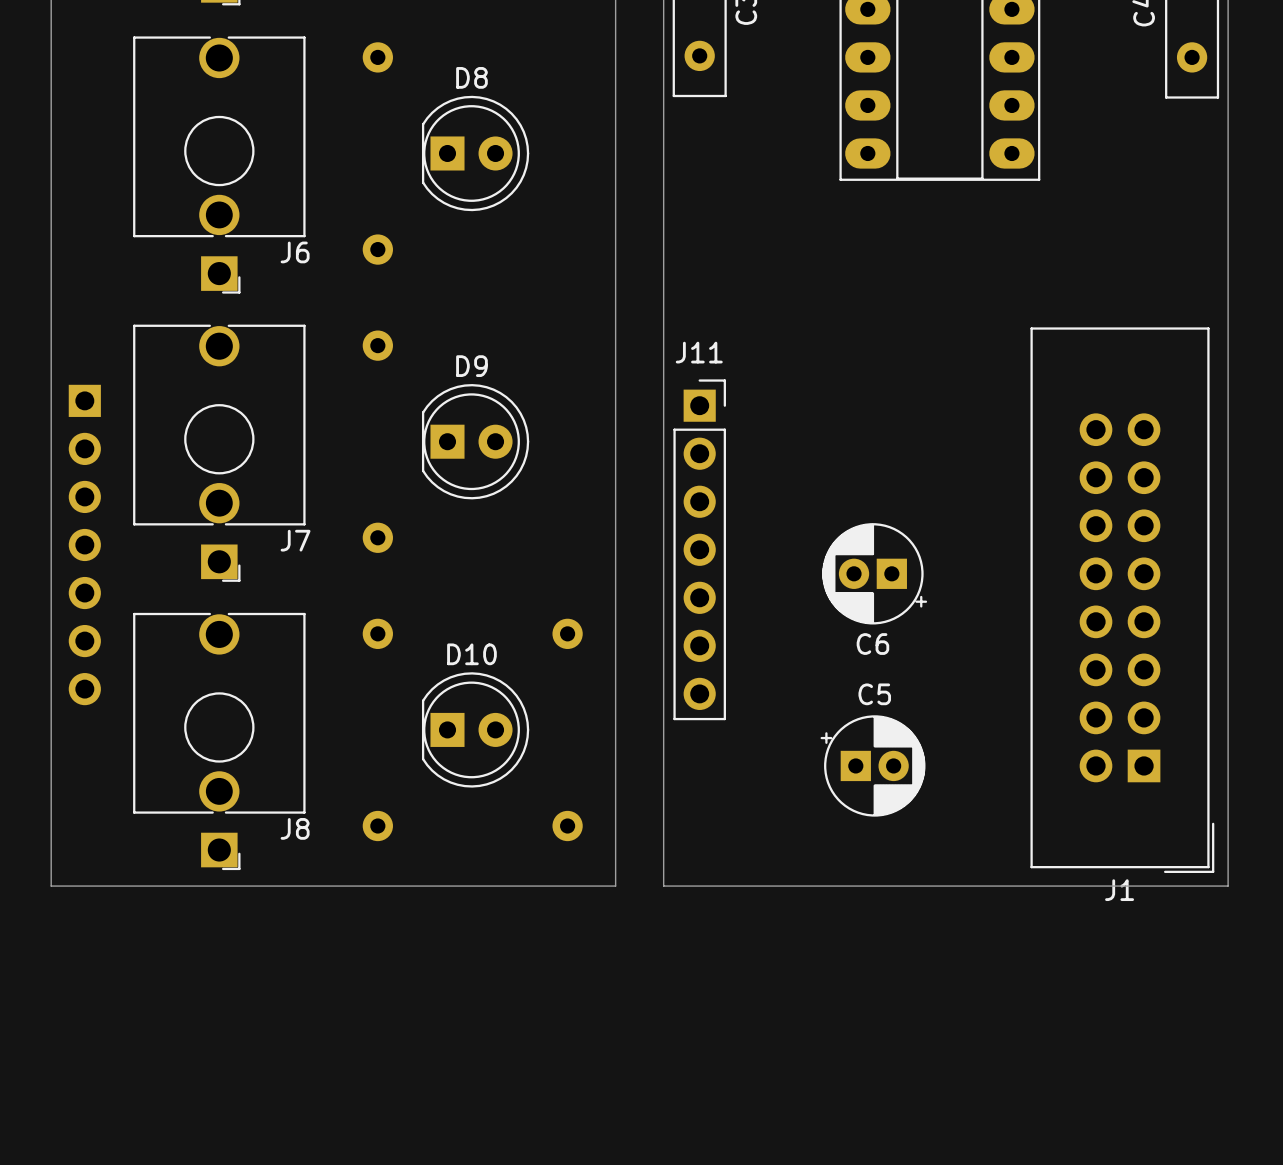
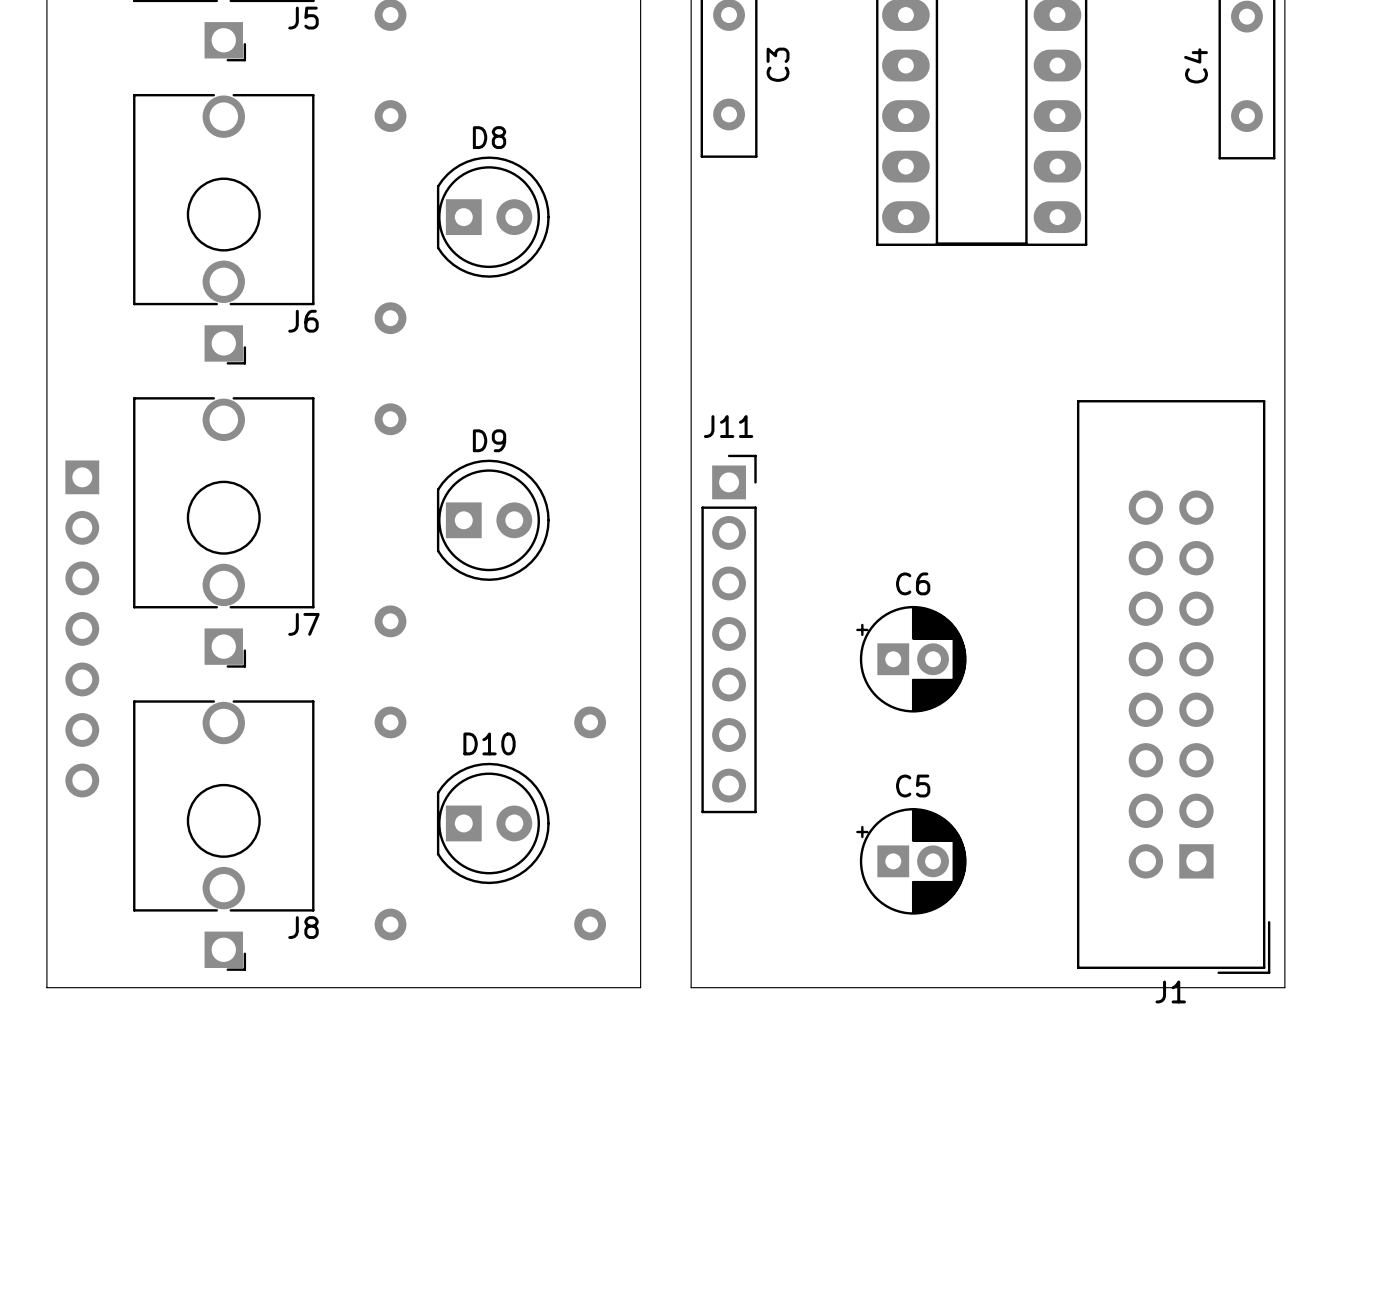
C6 rotation: 0° (874, 573) -> 180° (911, 659)

